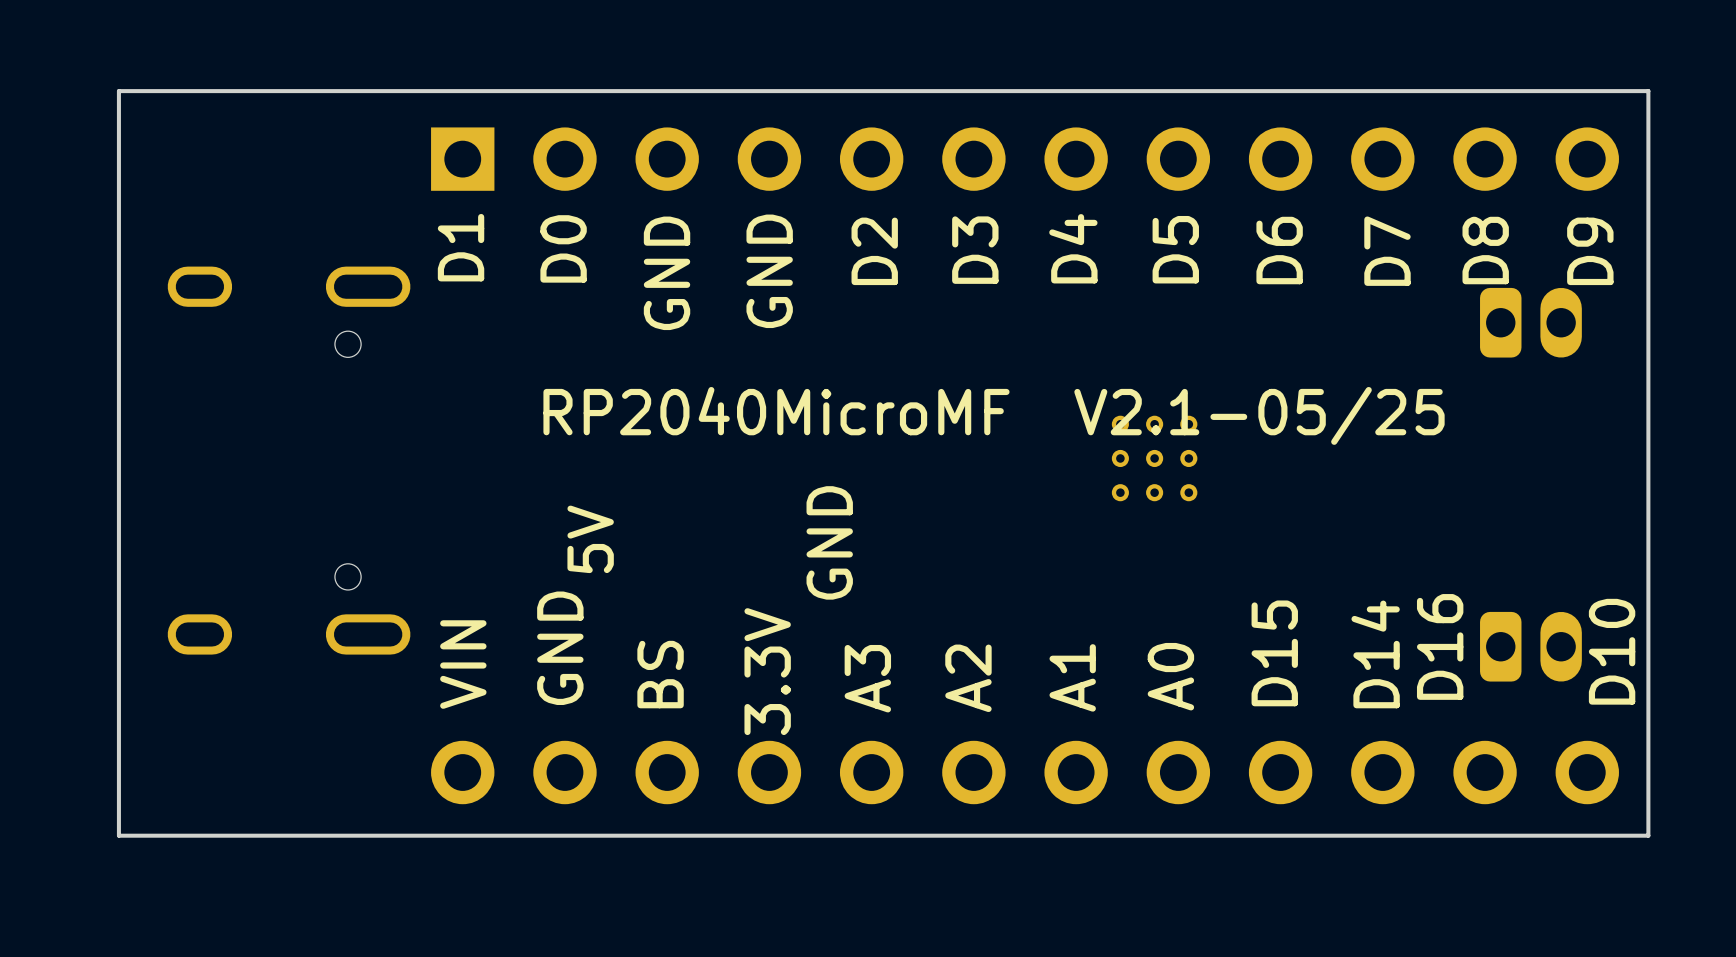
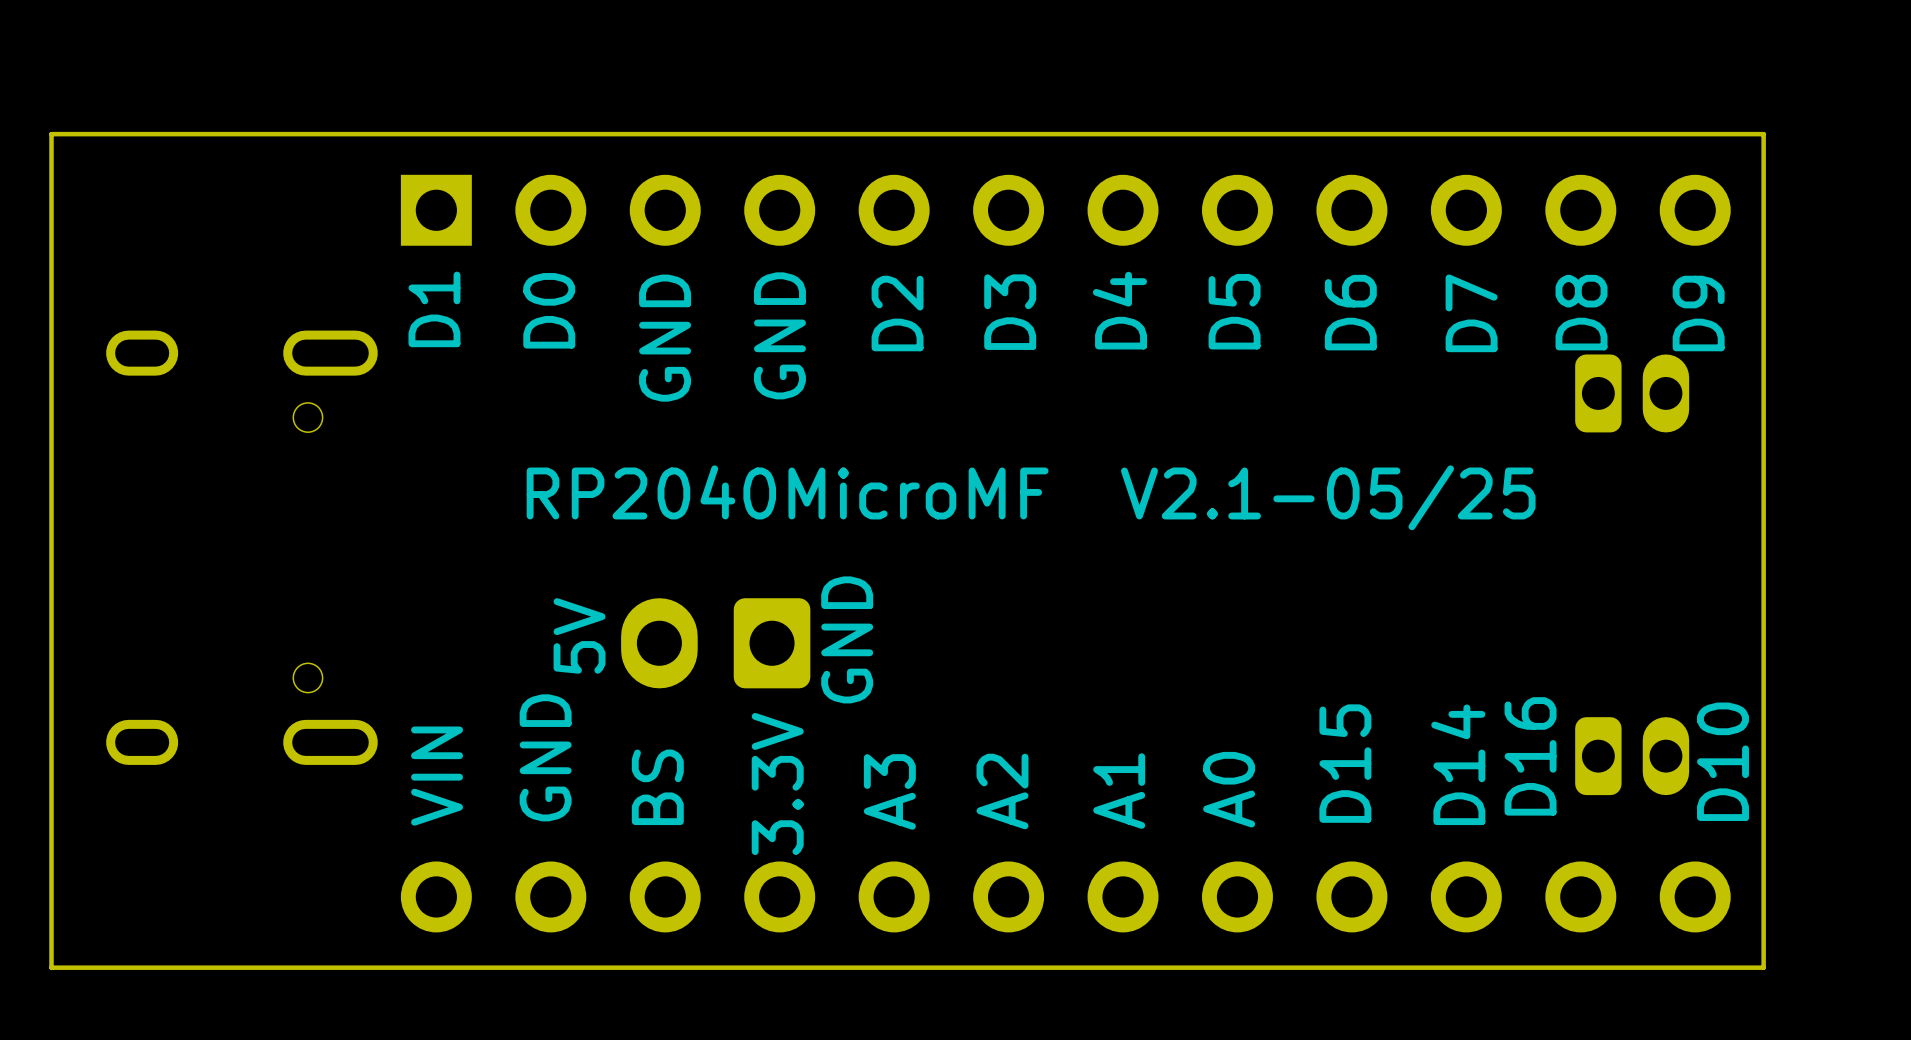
part: (1154, 458) -> none
part: none -> (715, 643)

